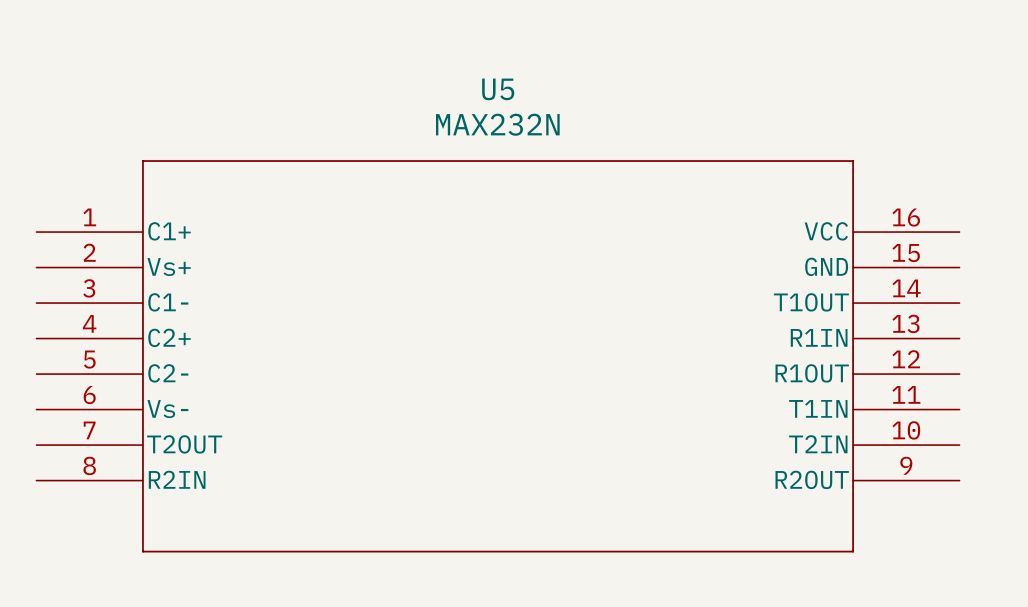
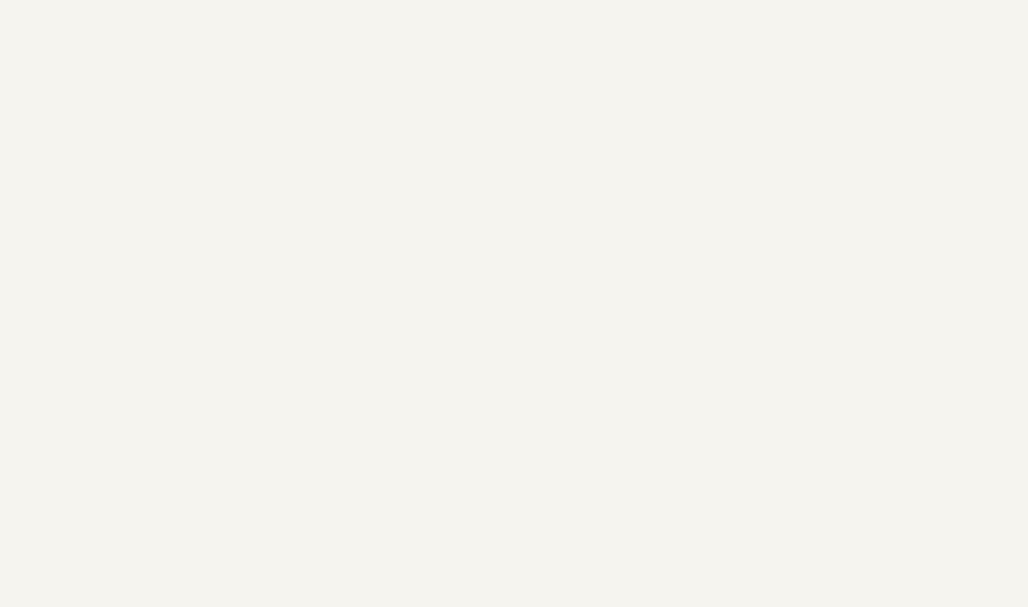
U5: MAX232N (498, 356) -> none

